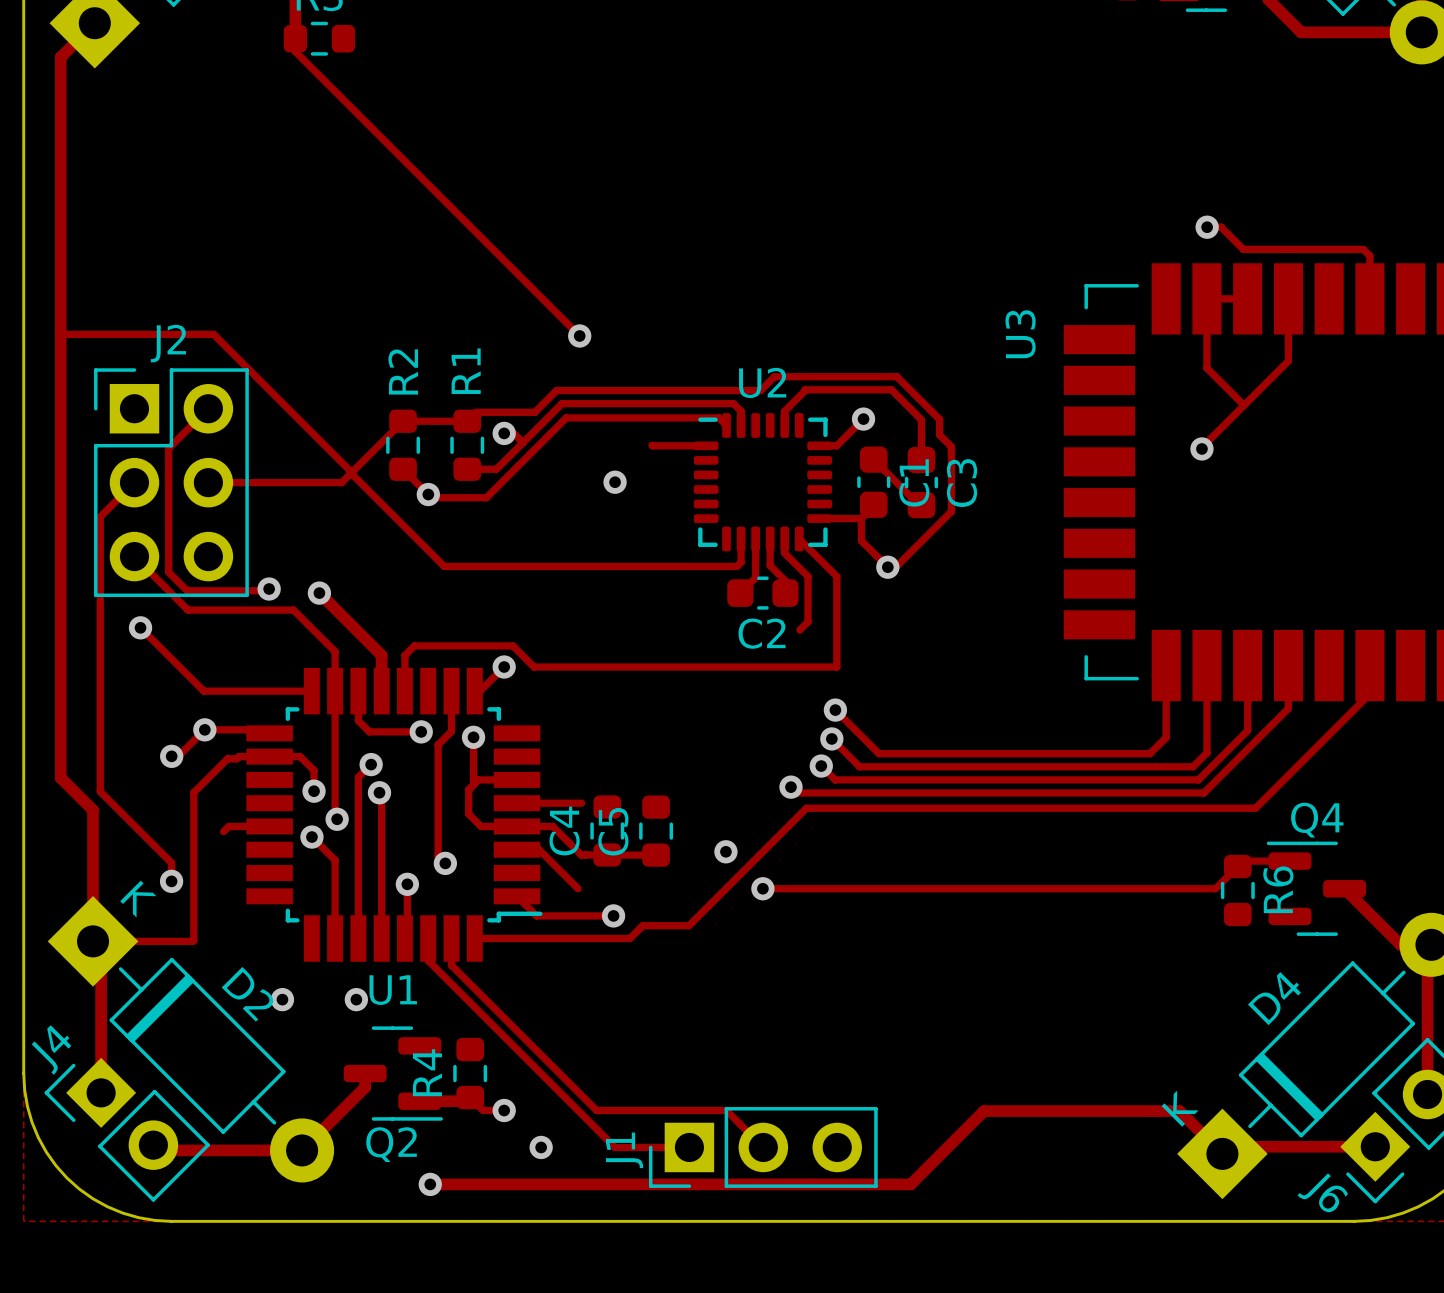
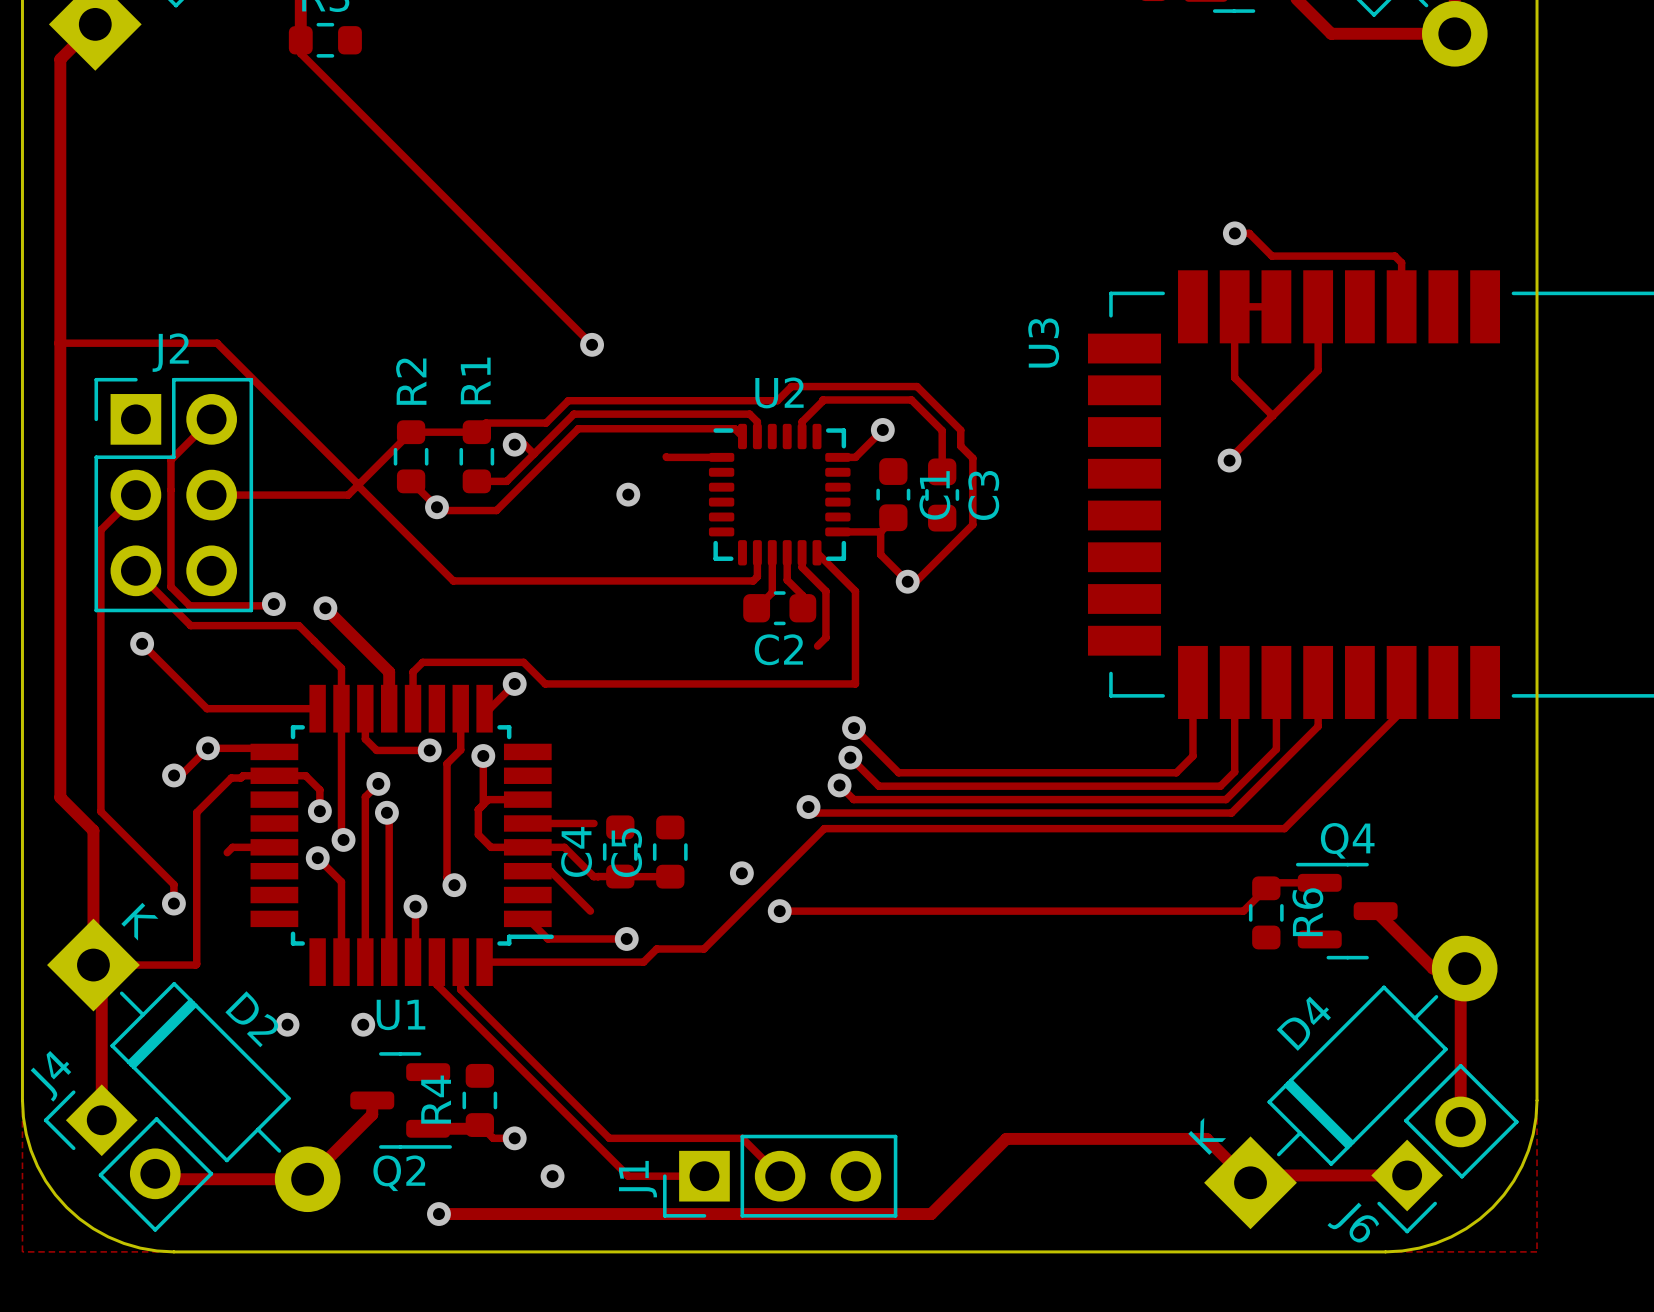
track: (873, 459) (919, 505) (921, 505) -> none

